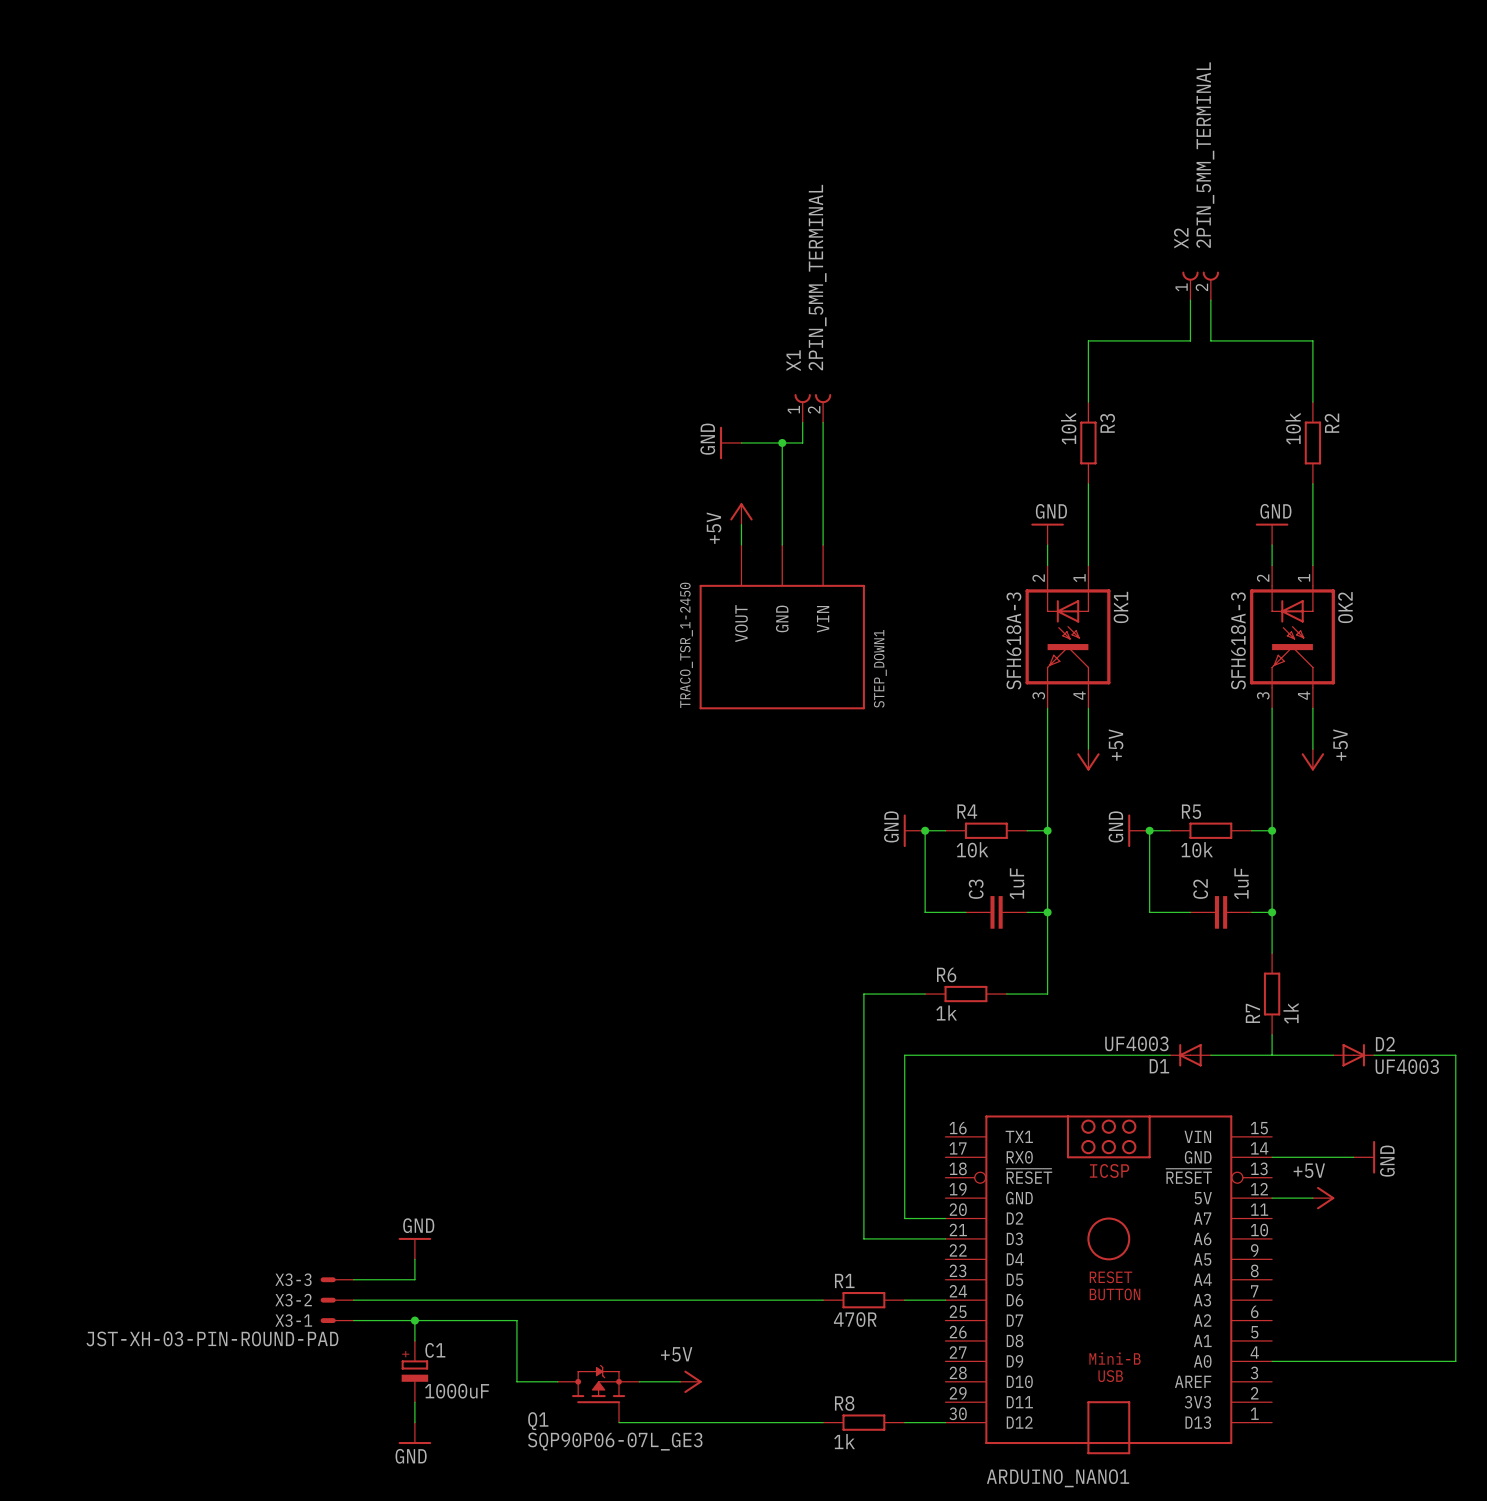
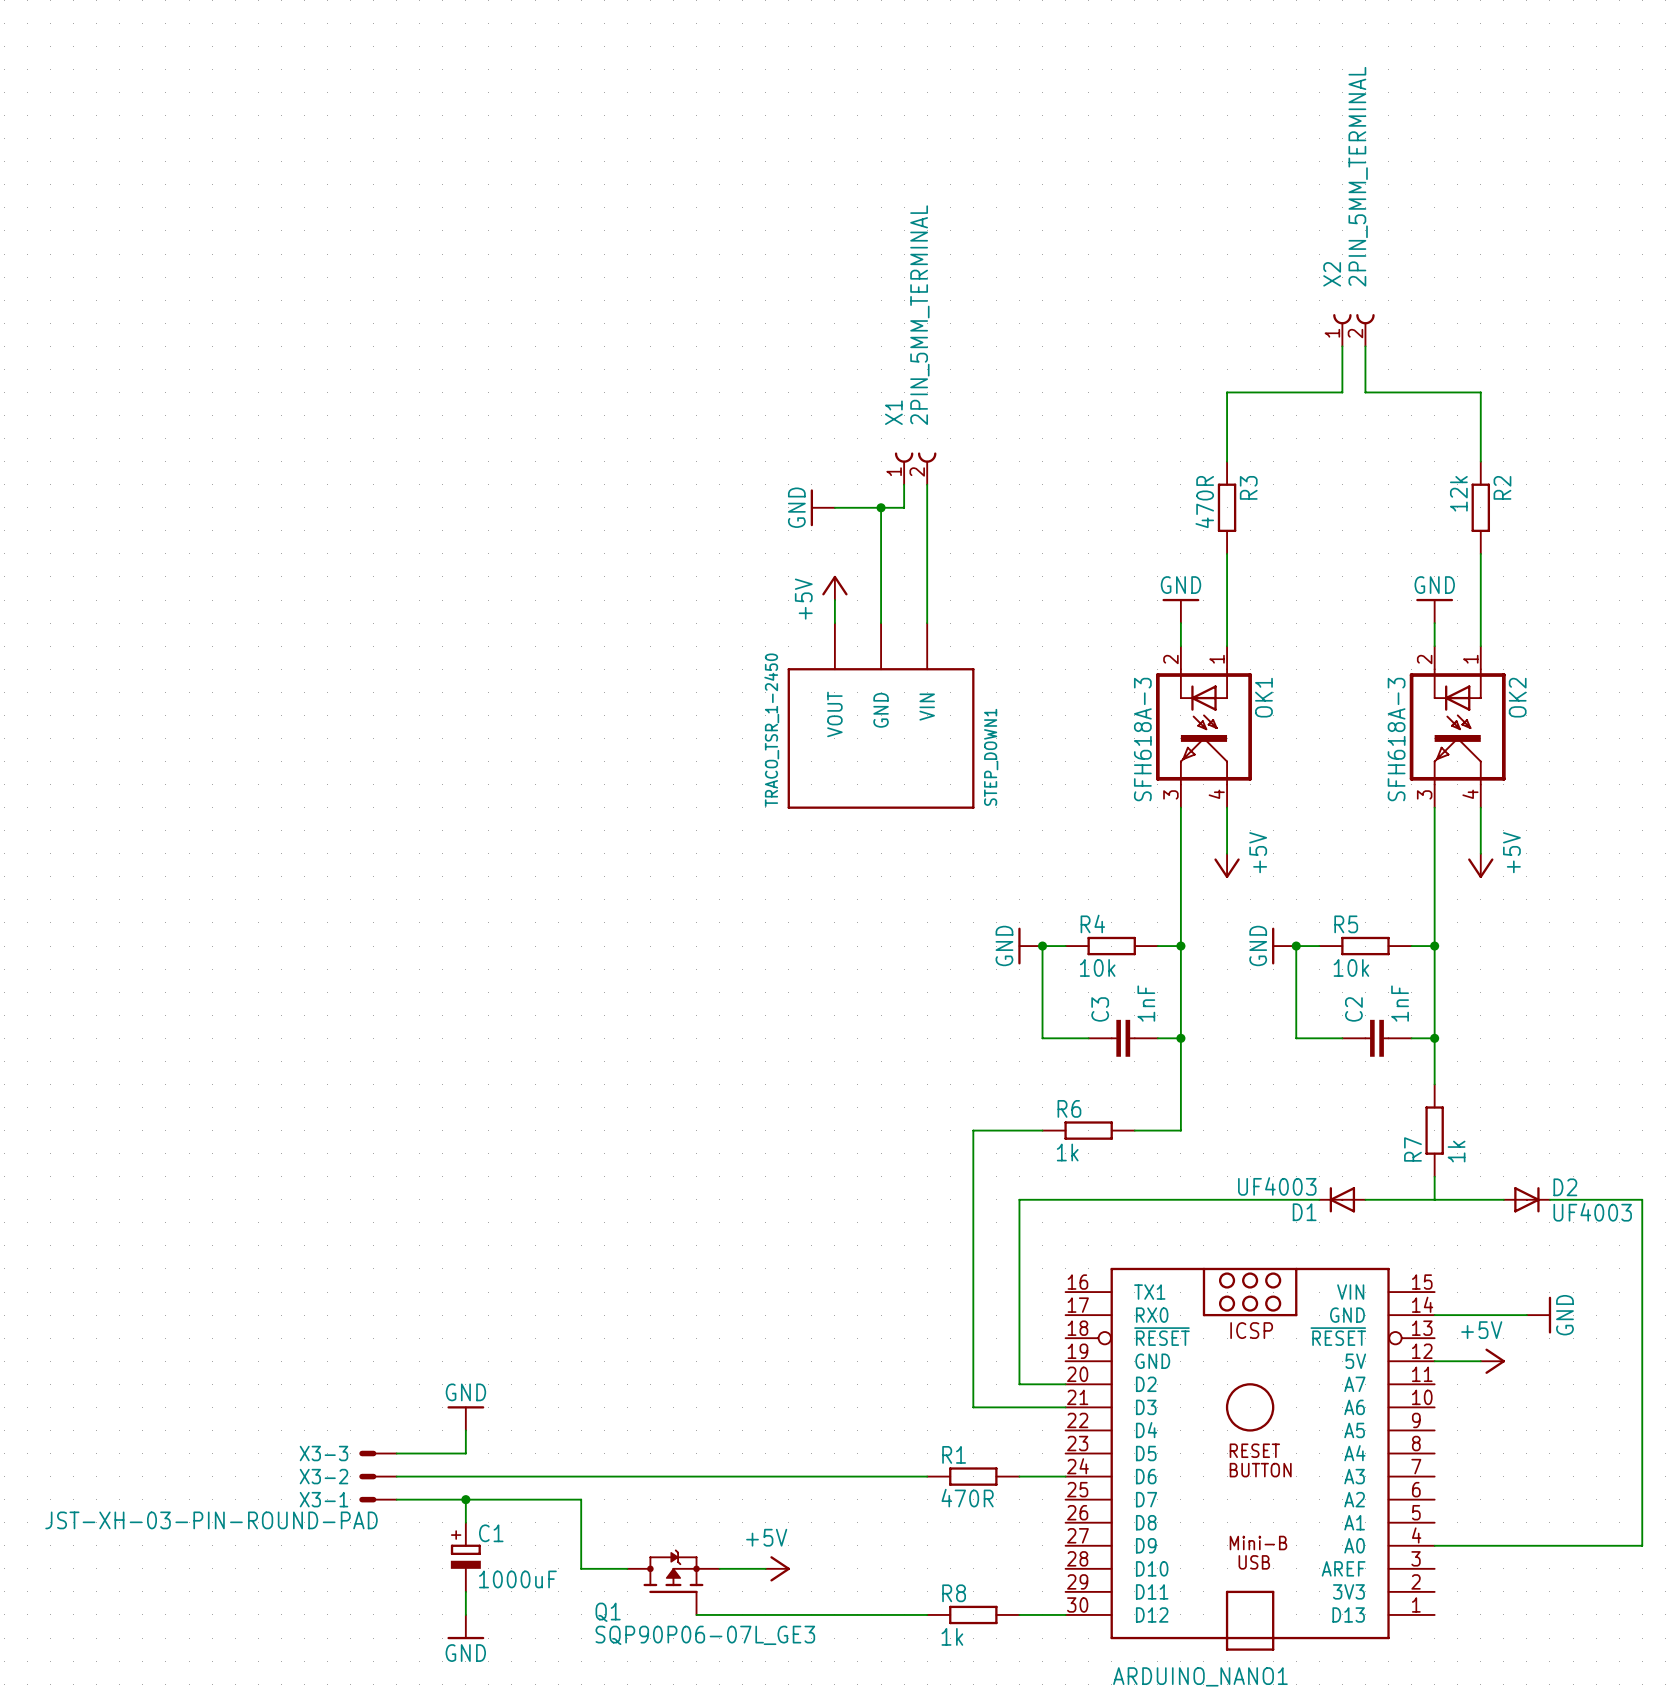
R3 value: 10k (1068, 428) -> 470R (1204, 502)
R2 value: 10k (1293, 428) -> 12k (1458, 493)
C3 value: 1uF (1017, 883) -> 1nF (1146, 1003)
C2 value: 1uF (1241, 883) -> 1nF (1400, 1003)

